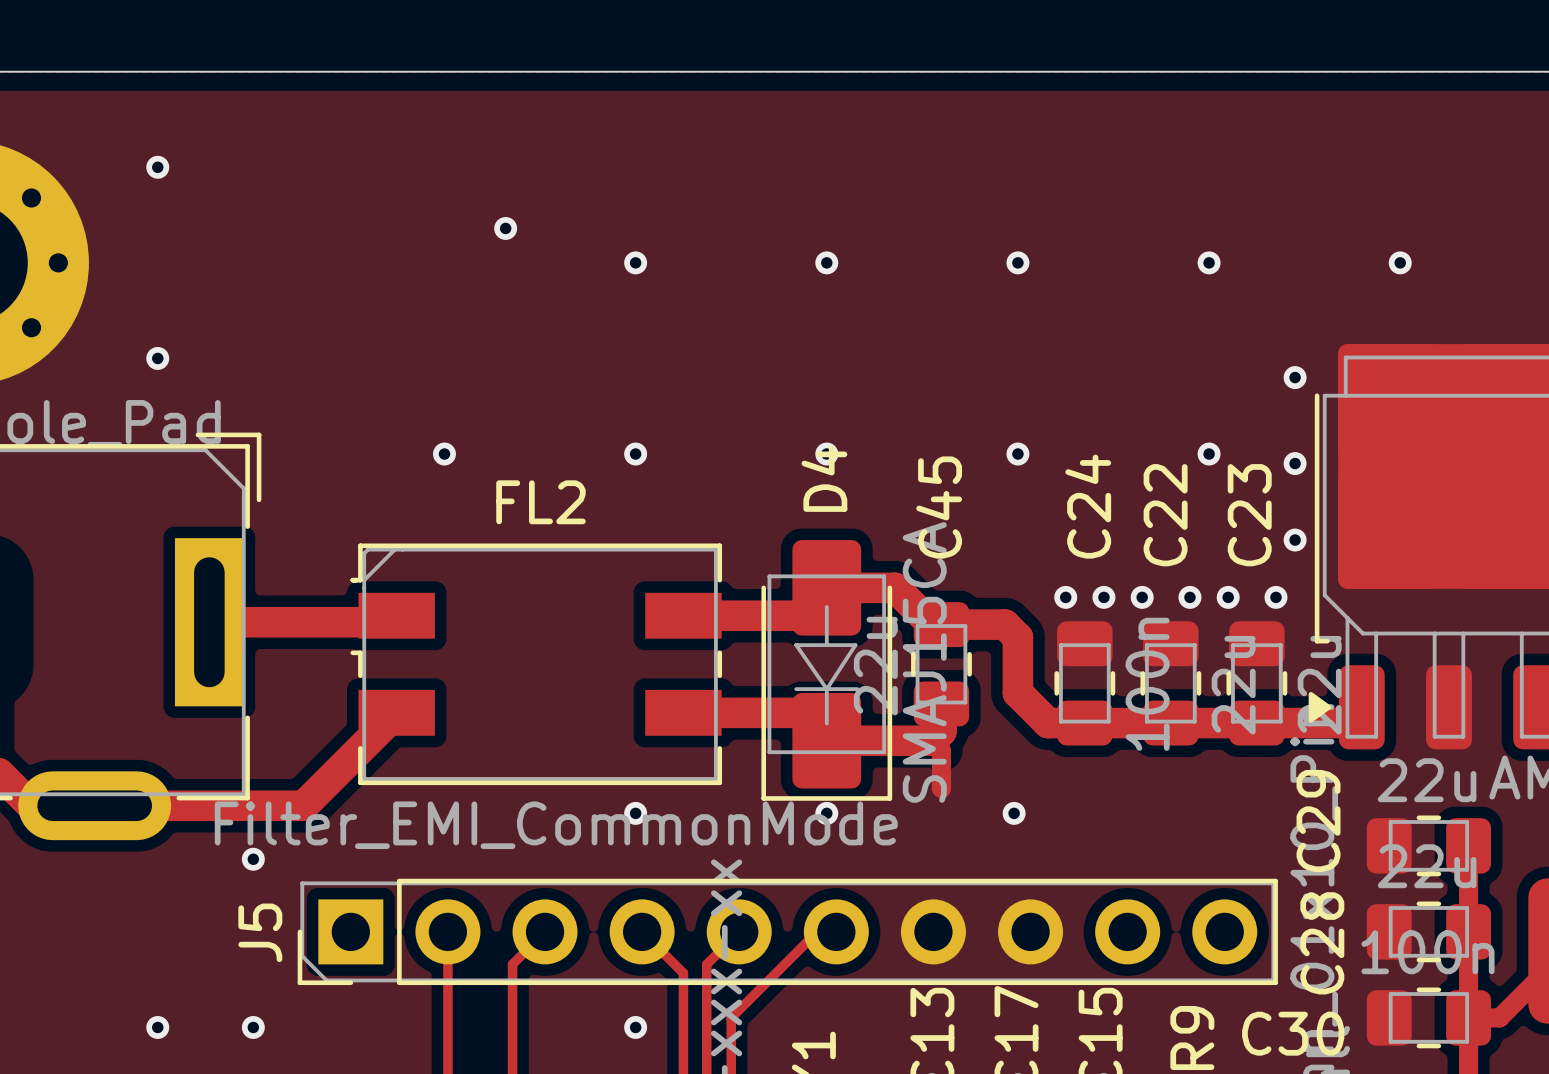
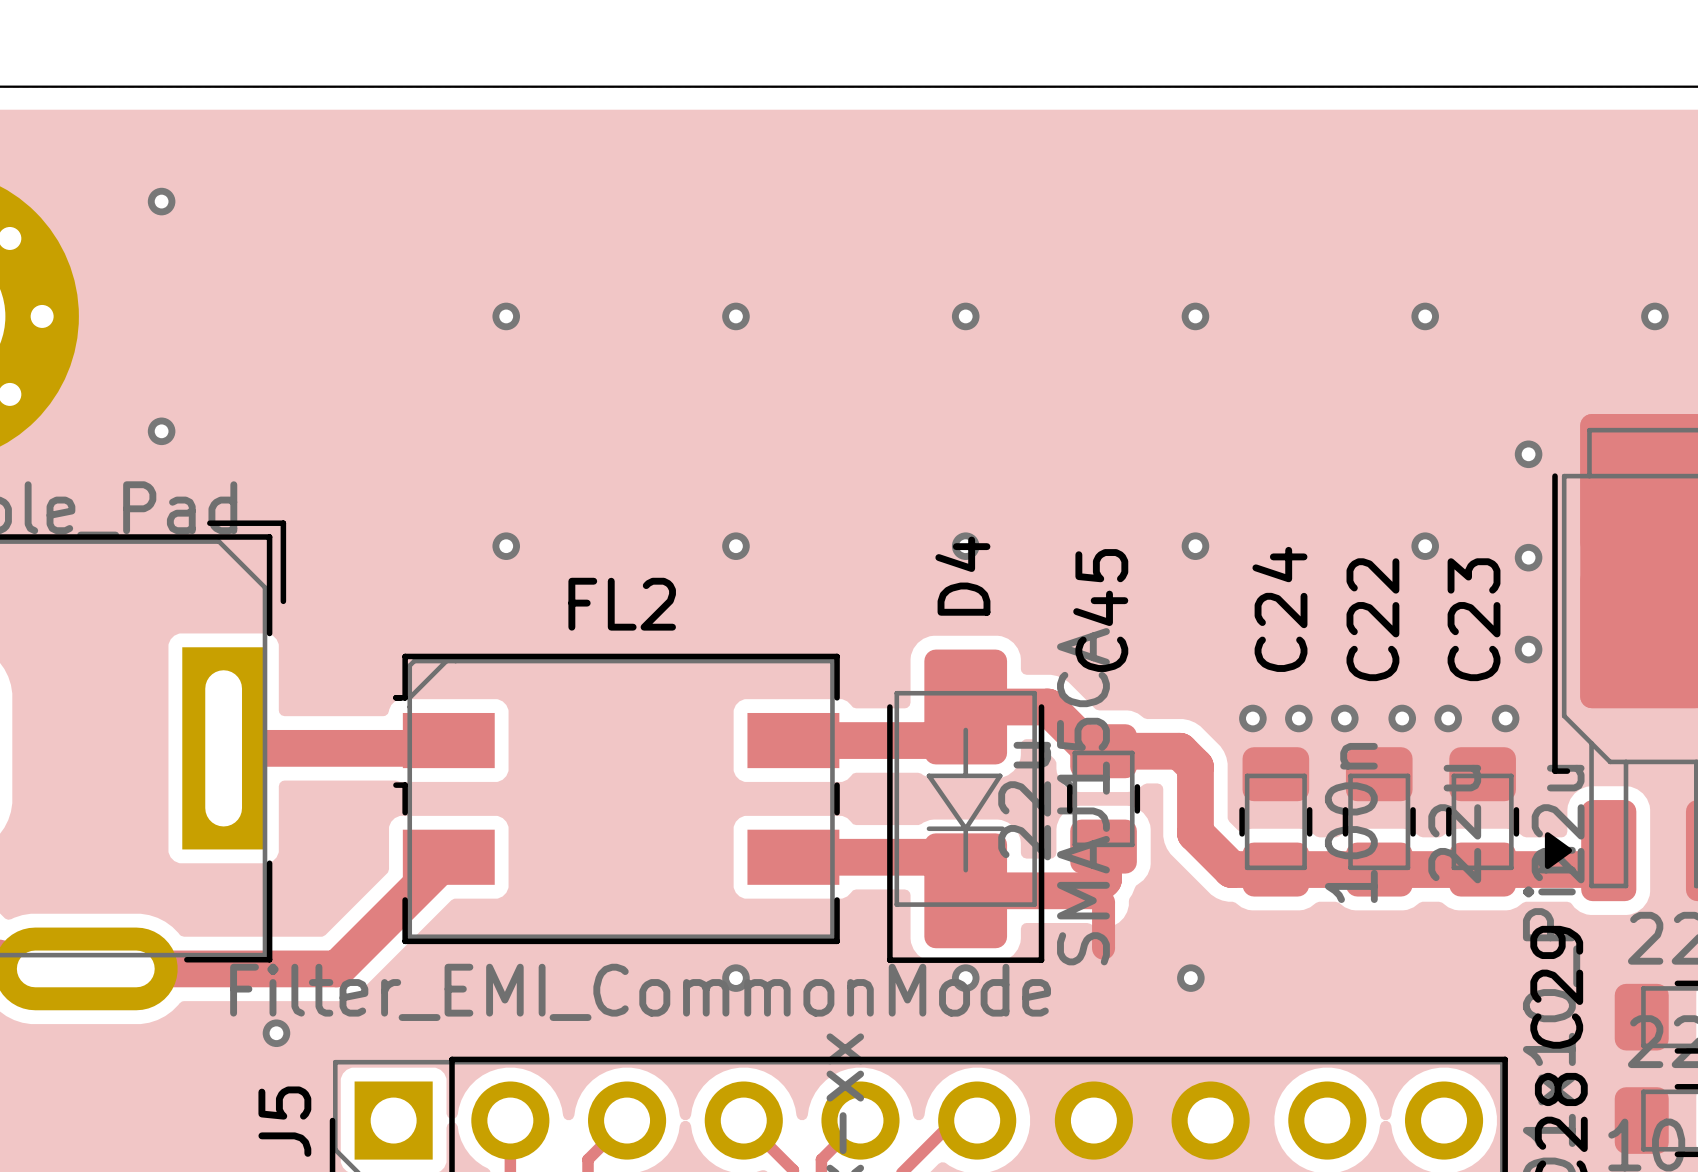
via position: (505, 228) -> (506, 316)

